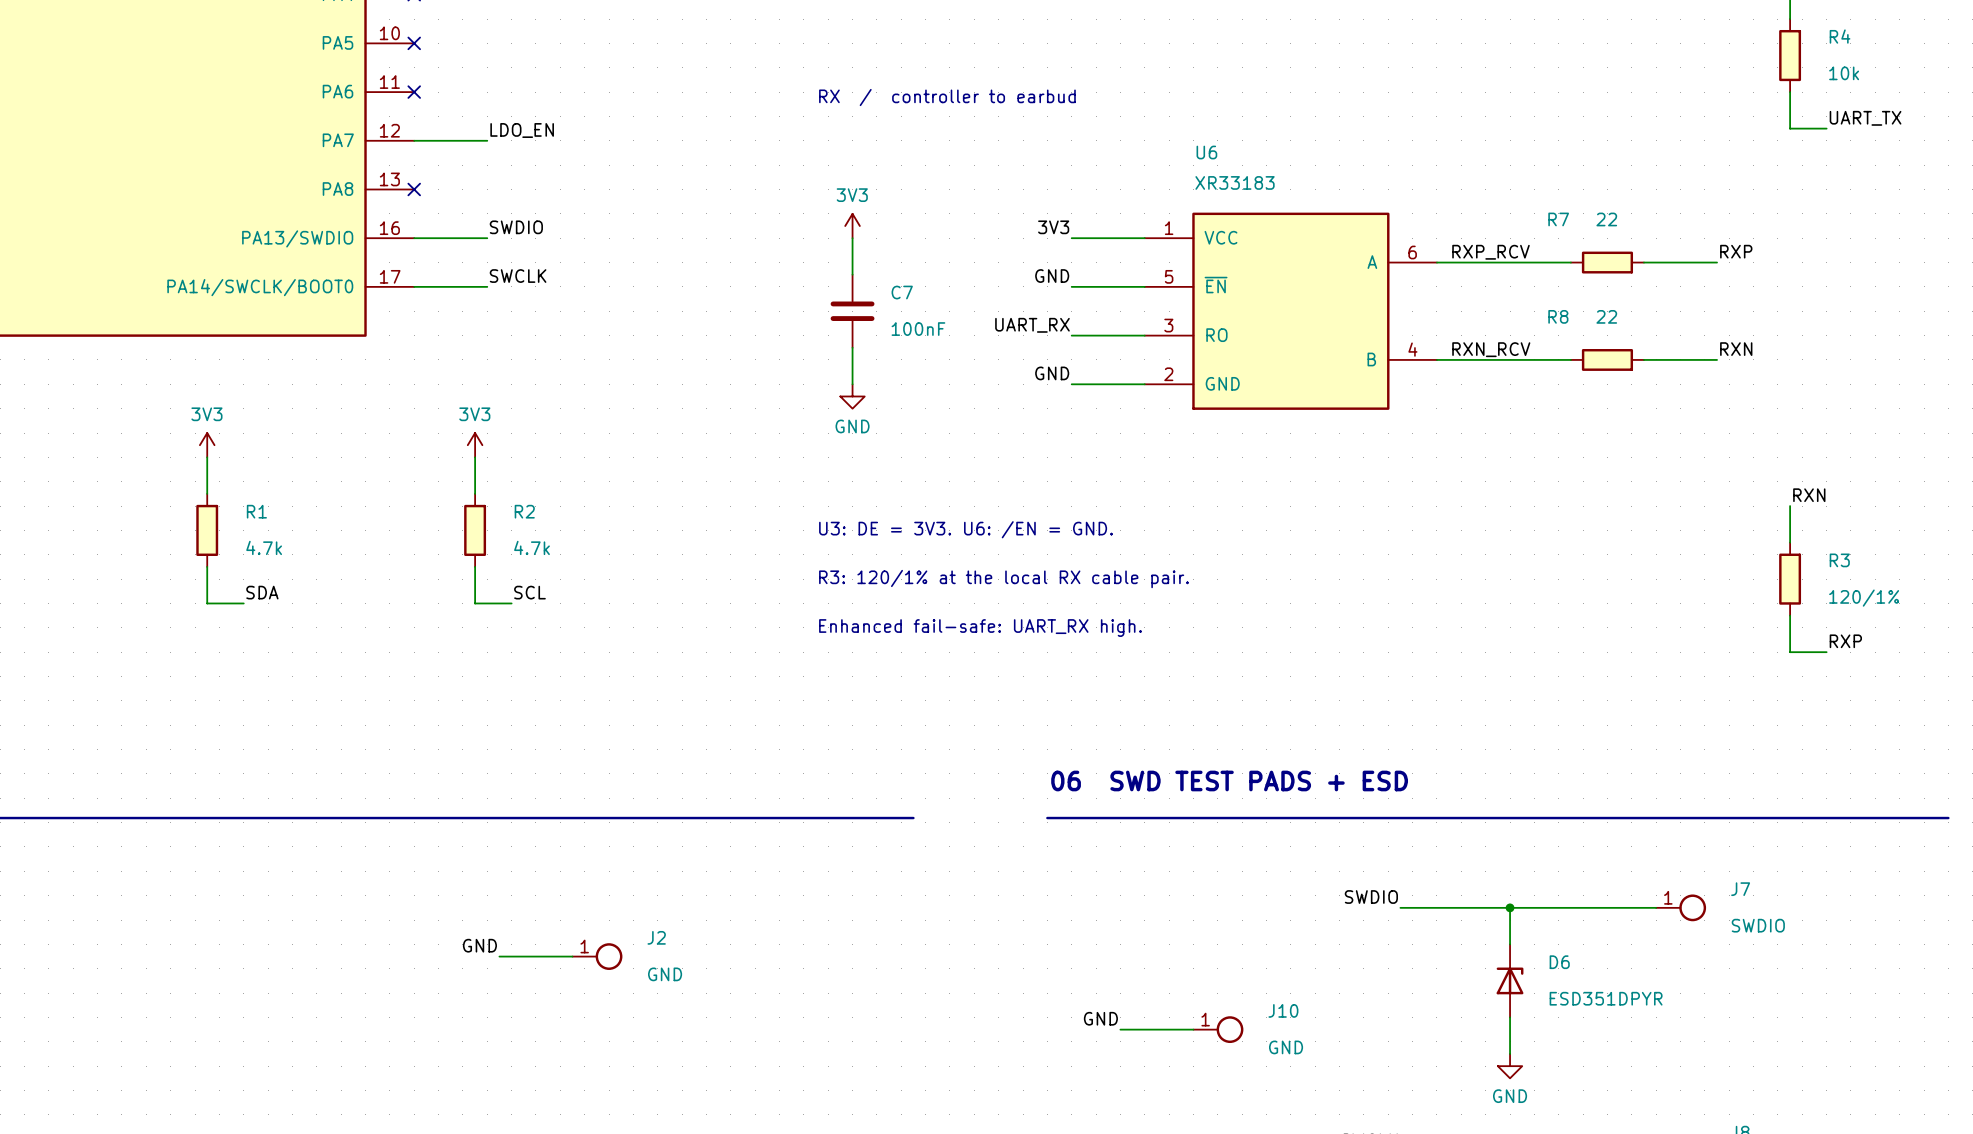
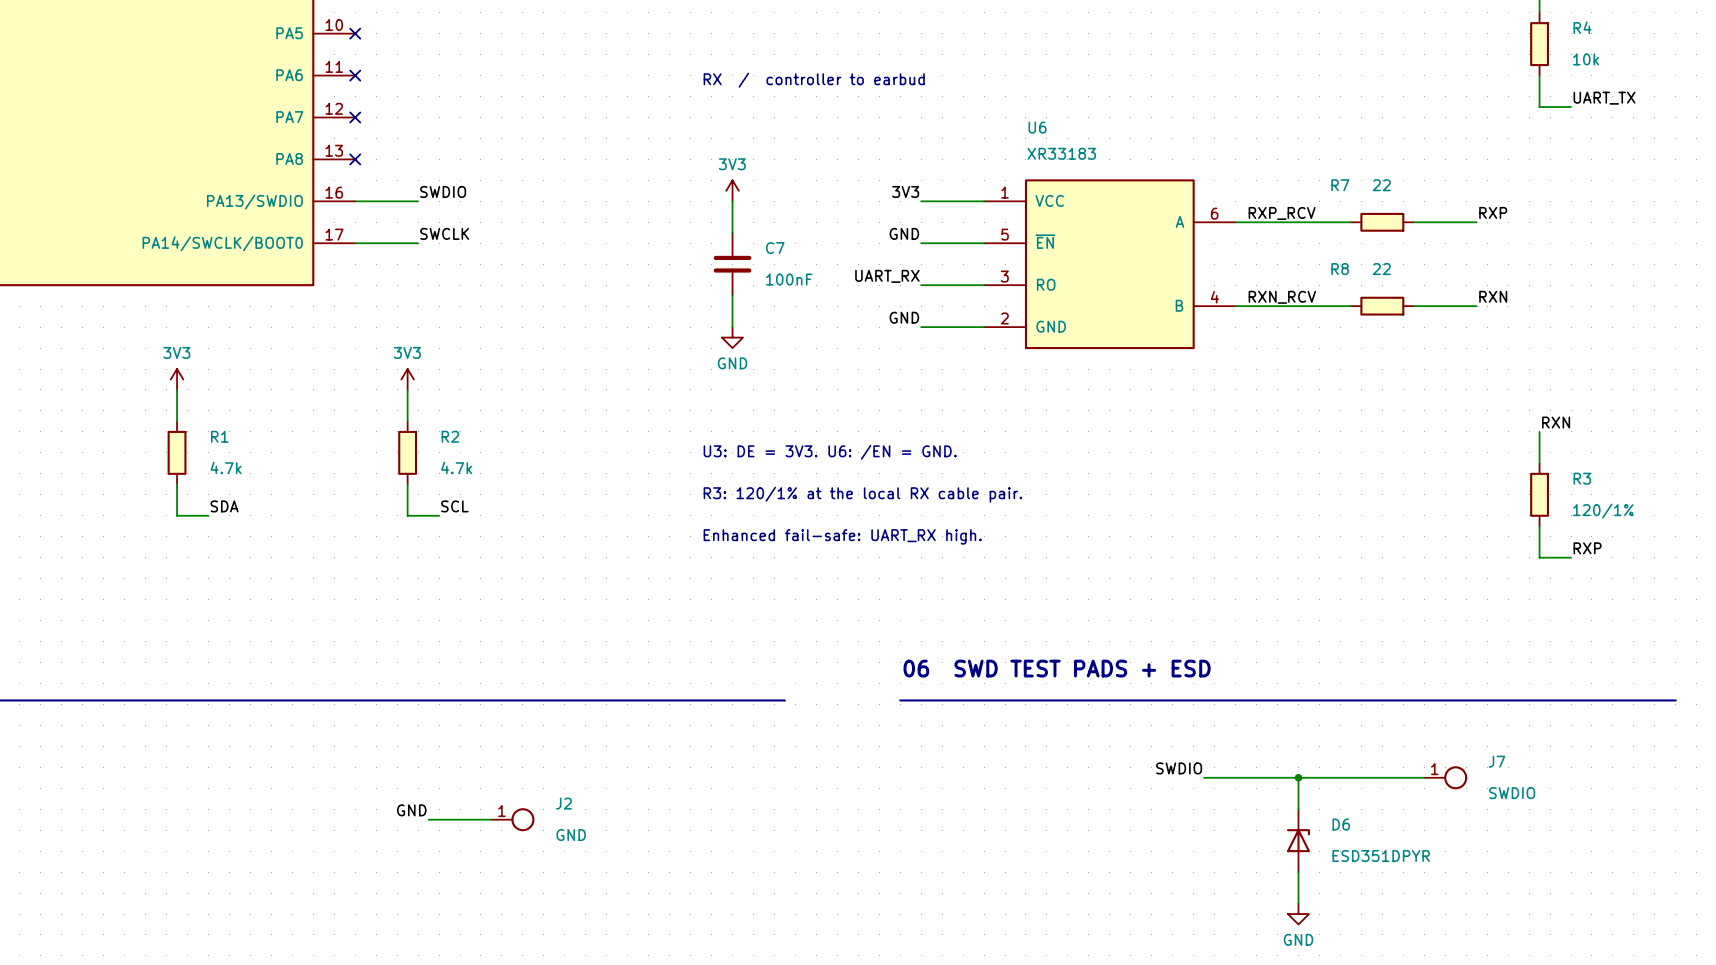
label: LDO_EN (522, 130) -> none
wire: (414, 140) (487, 140) -> none
no-connect mark: none -> (355, 117)
label: GND (1100, 1018) -> none
wire: (1120, 1029) (1193, 1029) -> none
J10: GND (1218, 1029) -> none

